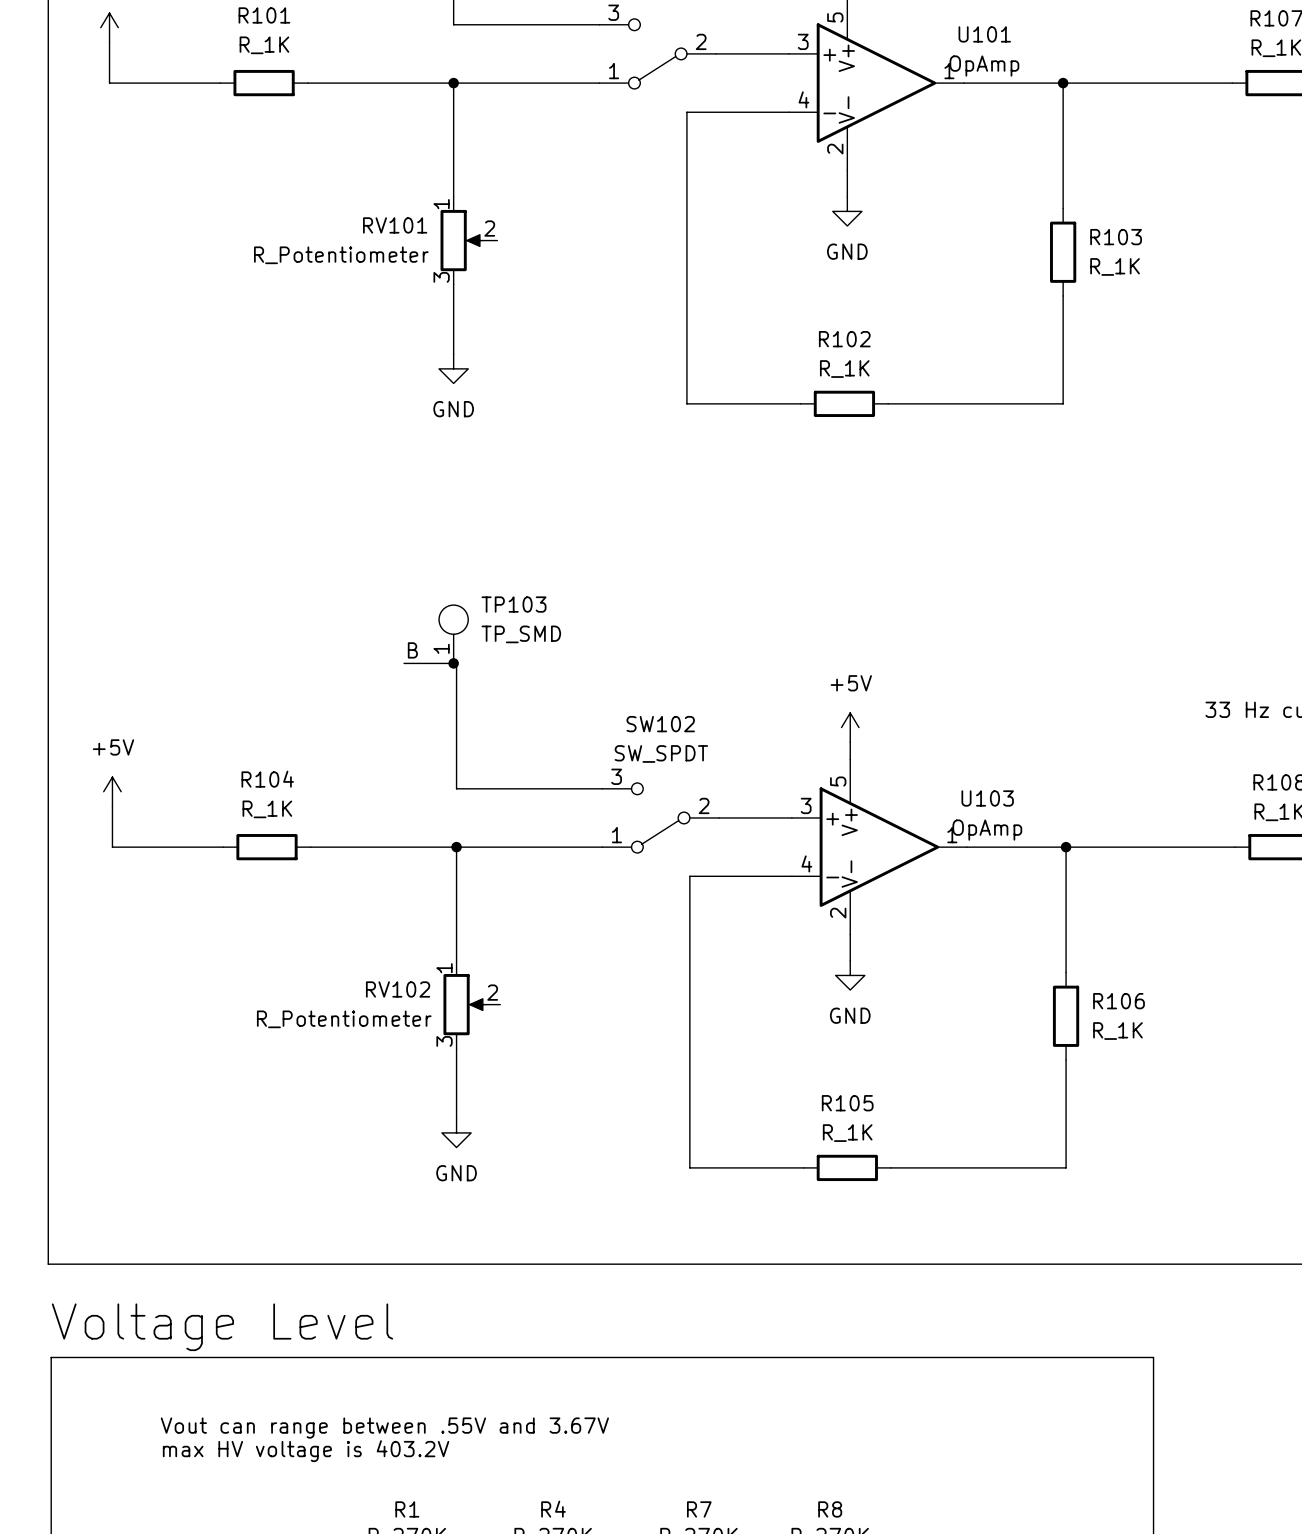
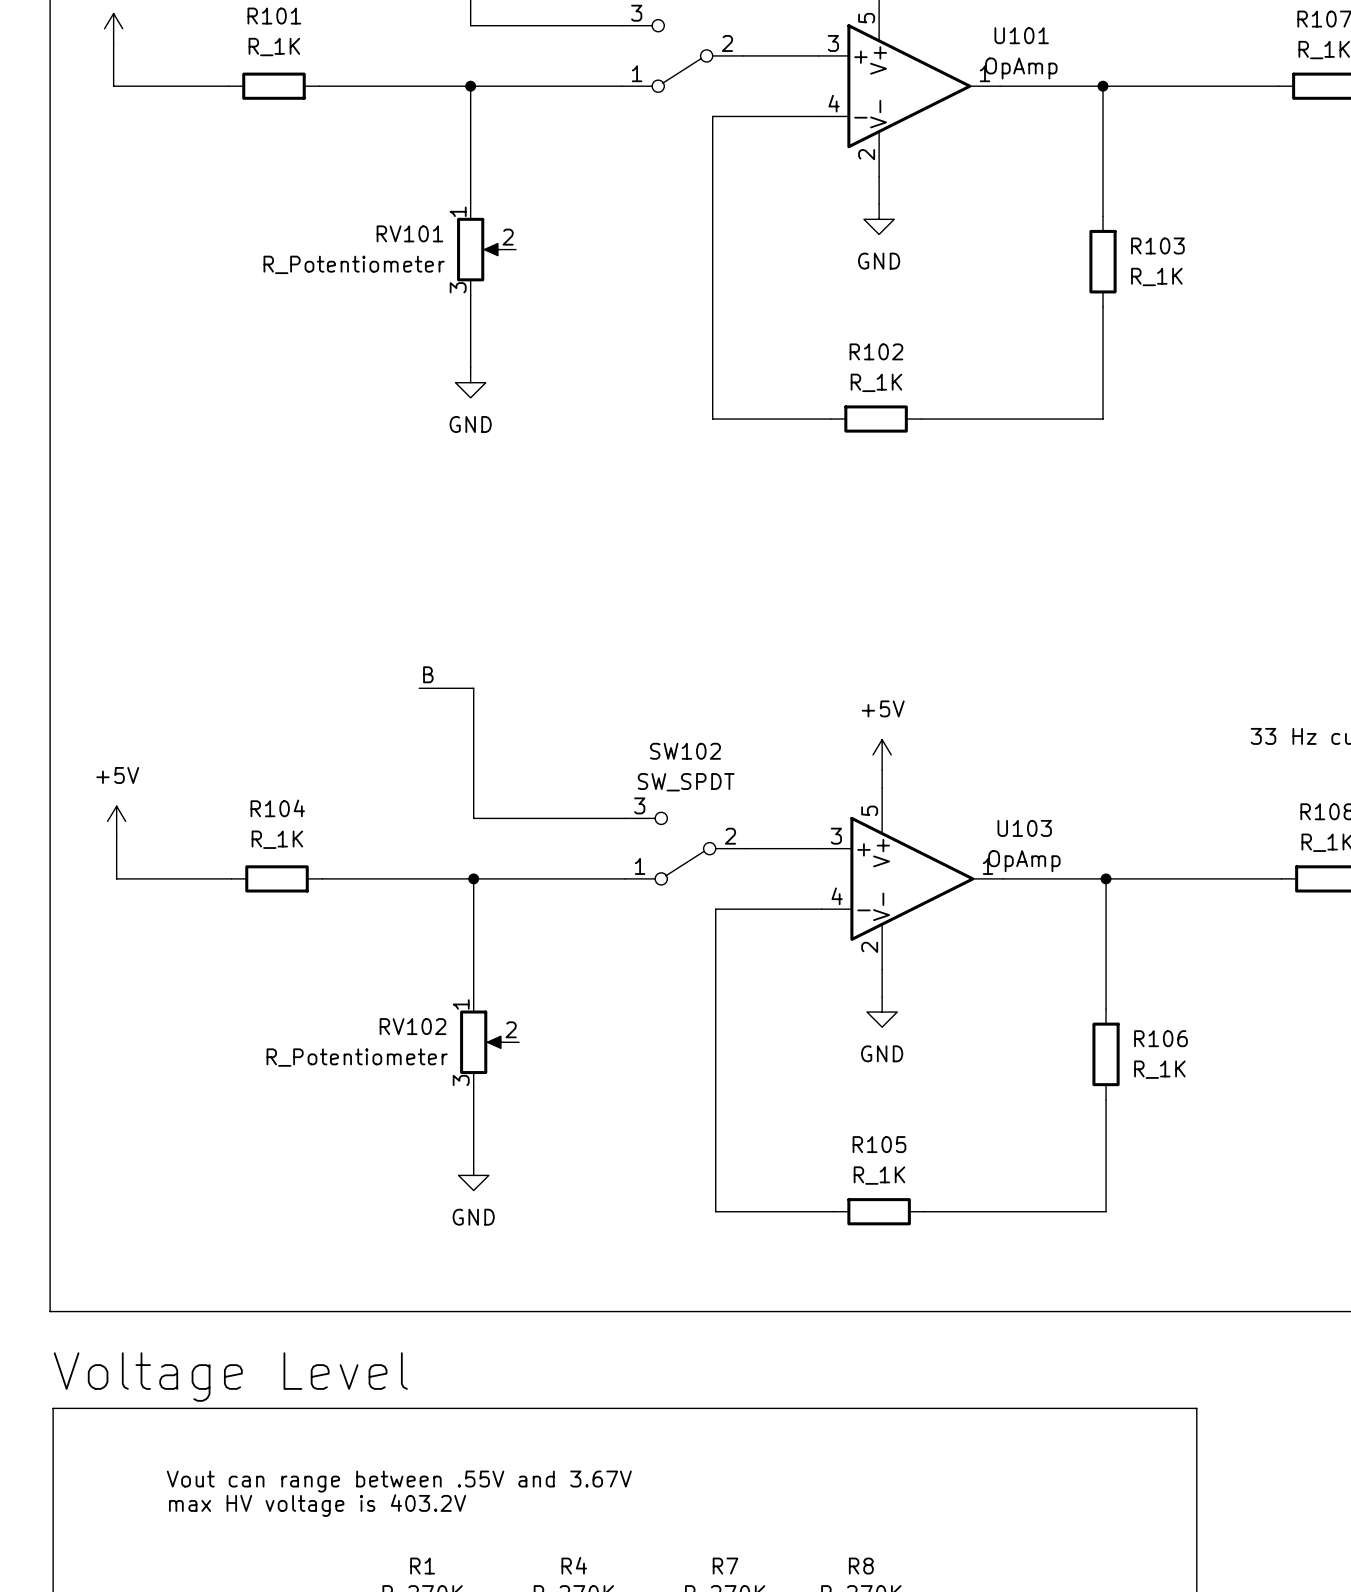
TP103: TP_SMD (453, 634) -> none
junction: (453, 663) -> none

